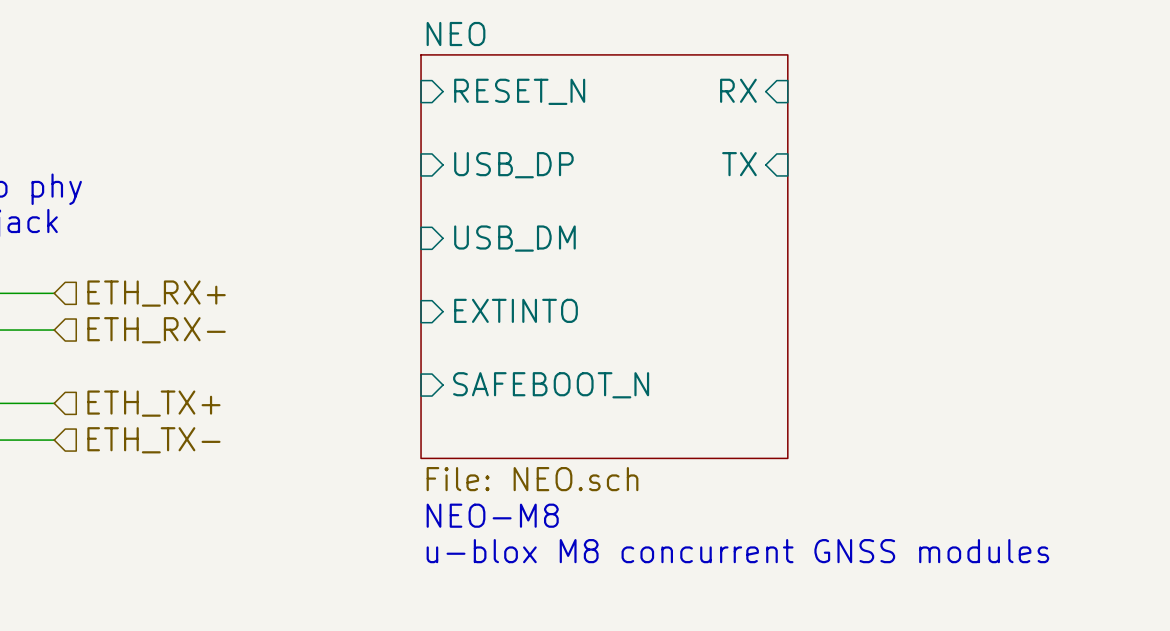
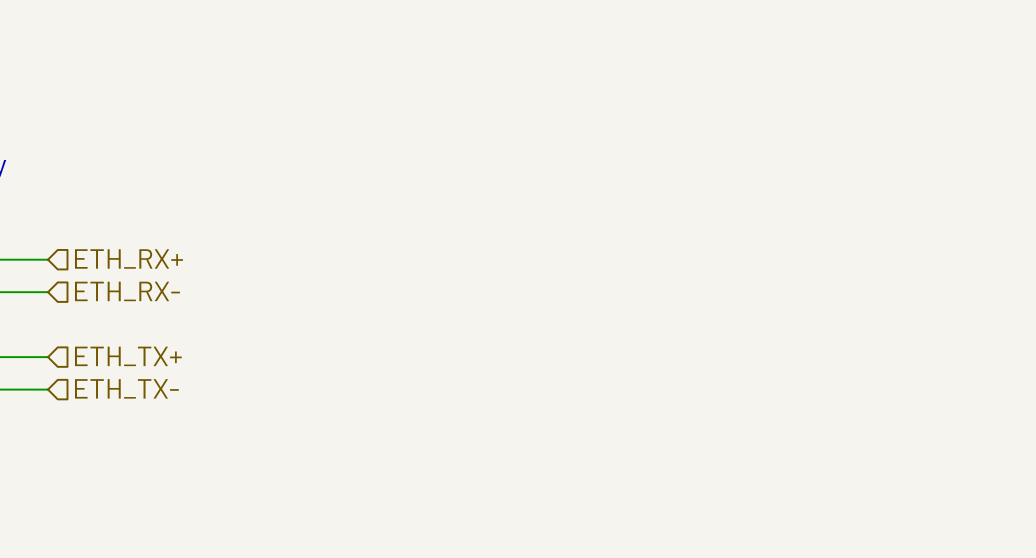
sheet pin: RX (738, 90) -> none
sheet pin: RESET_N (519, 91) -> none
sheet pin: TX (739, 164) -> none
sheet pin: USB_DP (513, 165) -> none
sheet pin: USB_DM (514, 238) -> none
sheet NEO: File: NEO.sch (604, 256) -> none
sheet pin: EXTINTO (516, 310) -> none
sheet pin: SAFEBOOT_N (551, 385) -> none
text: NEO-M8 (492, 515) -> none
text: u-blox M8 concurrent GNSS modules (737, 551) -> none

